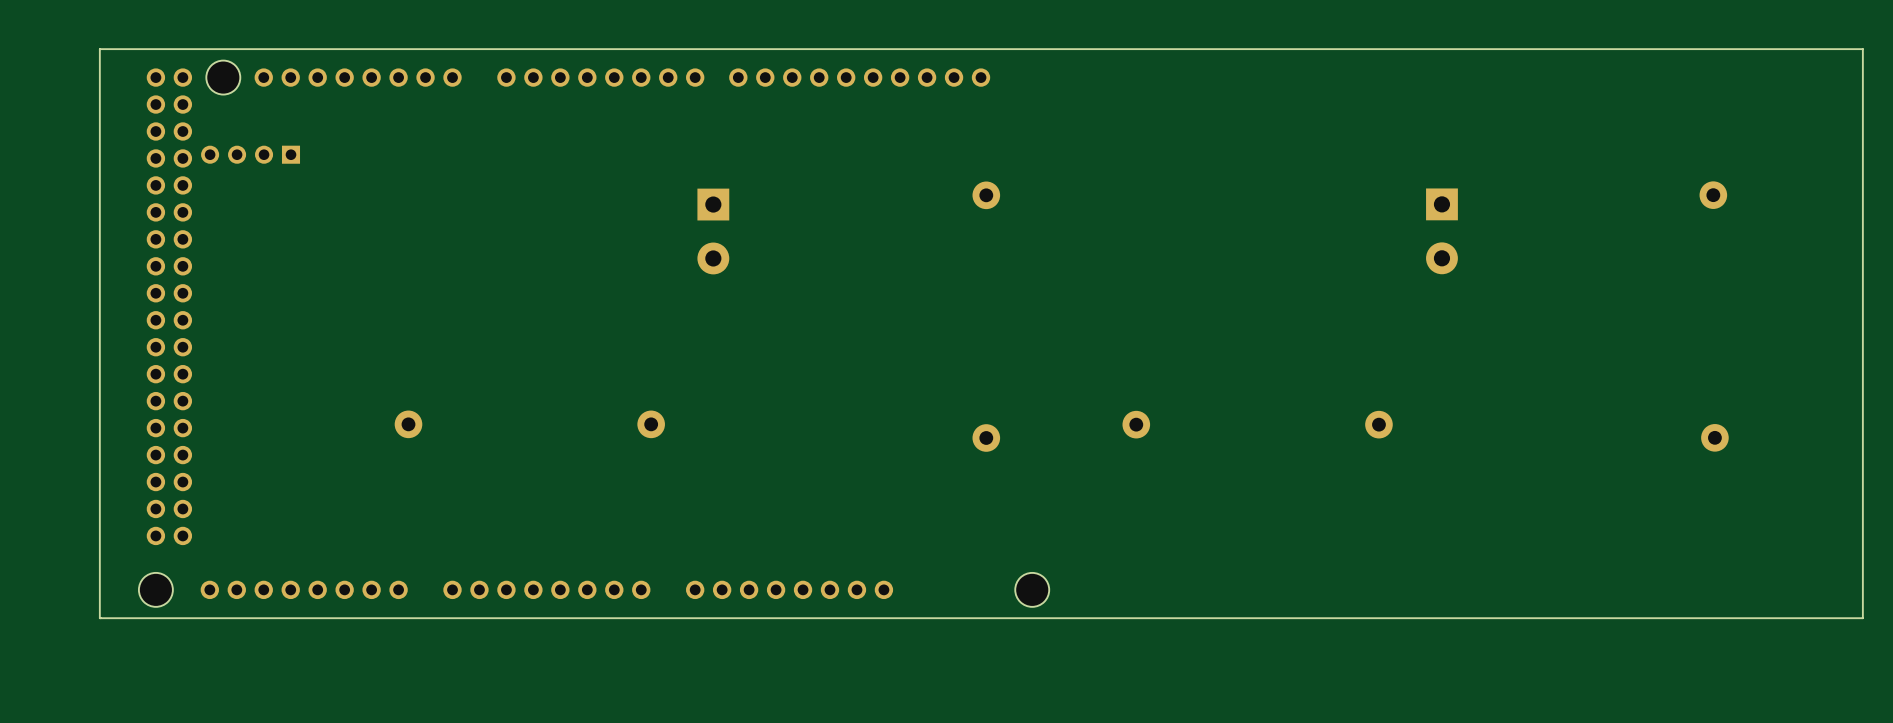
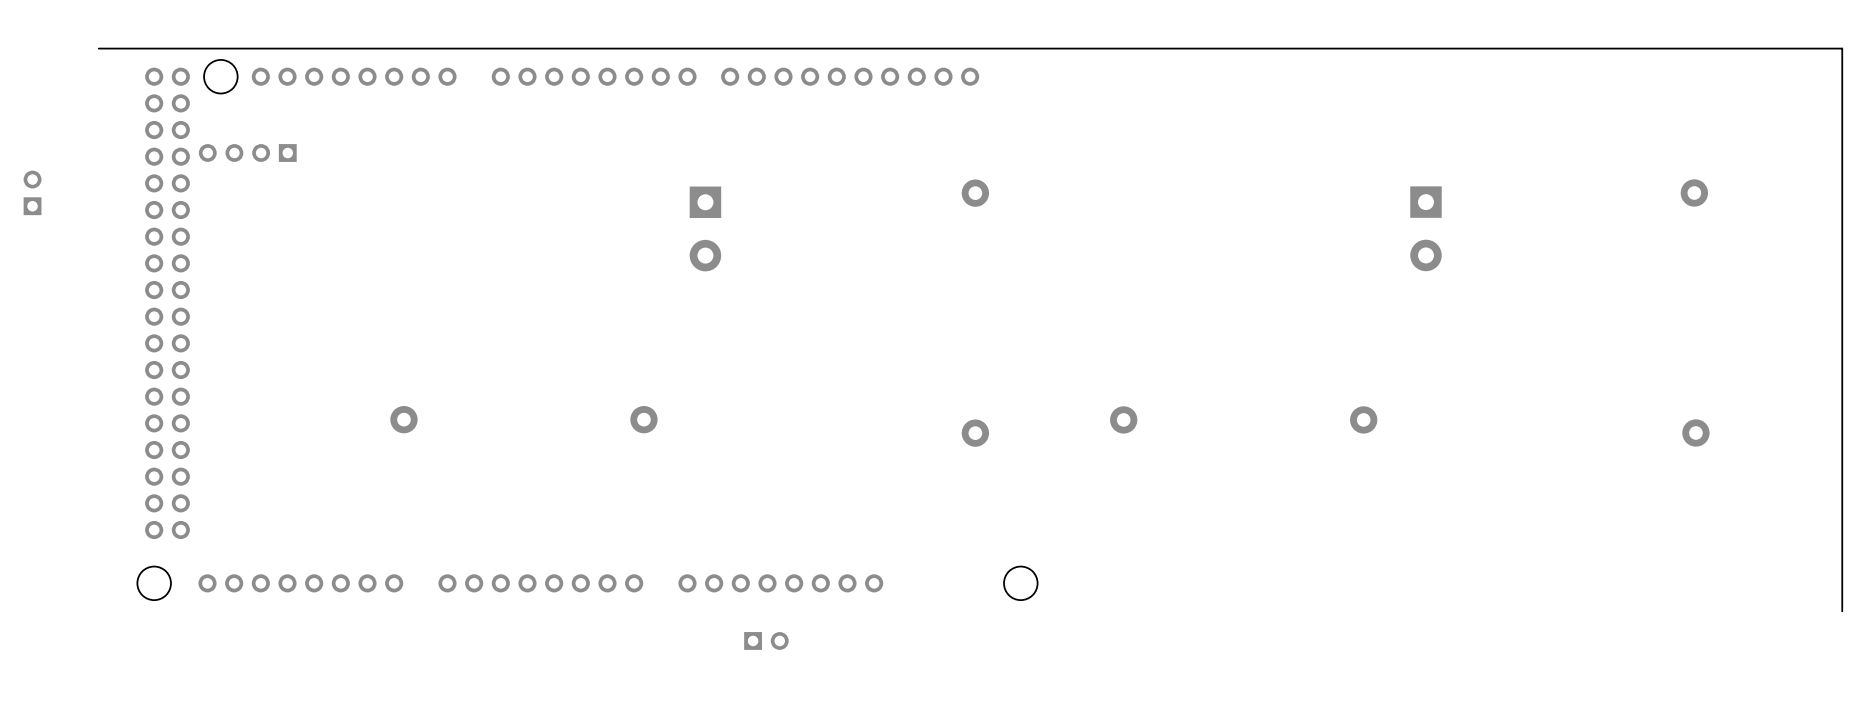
board edge: (99, 49) (99, 618) (1862, 618) -> none
part: none -> (32, 192)
part: none -> (766, 640)

